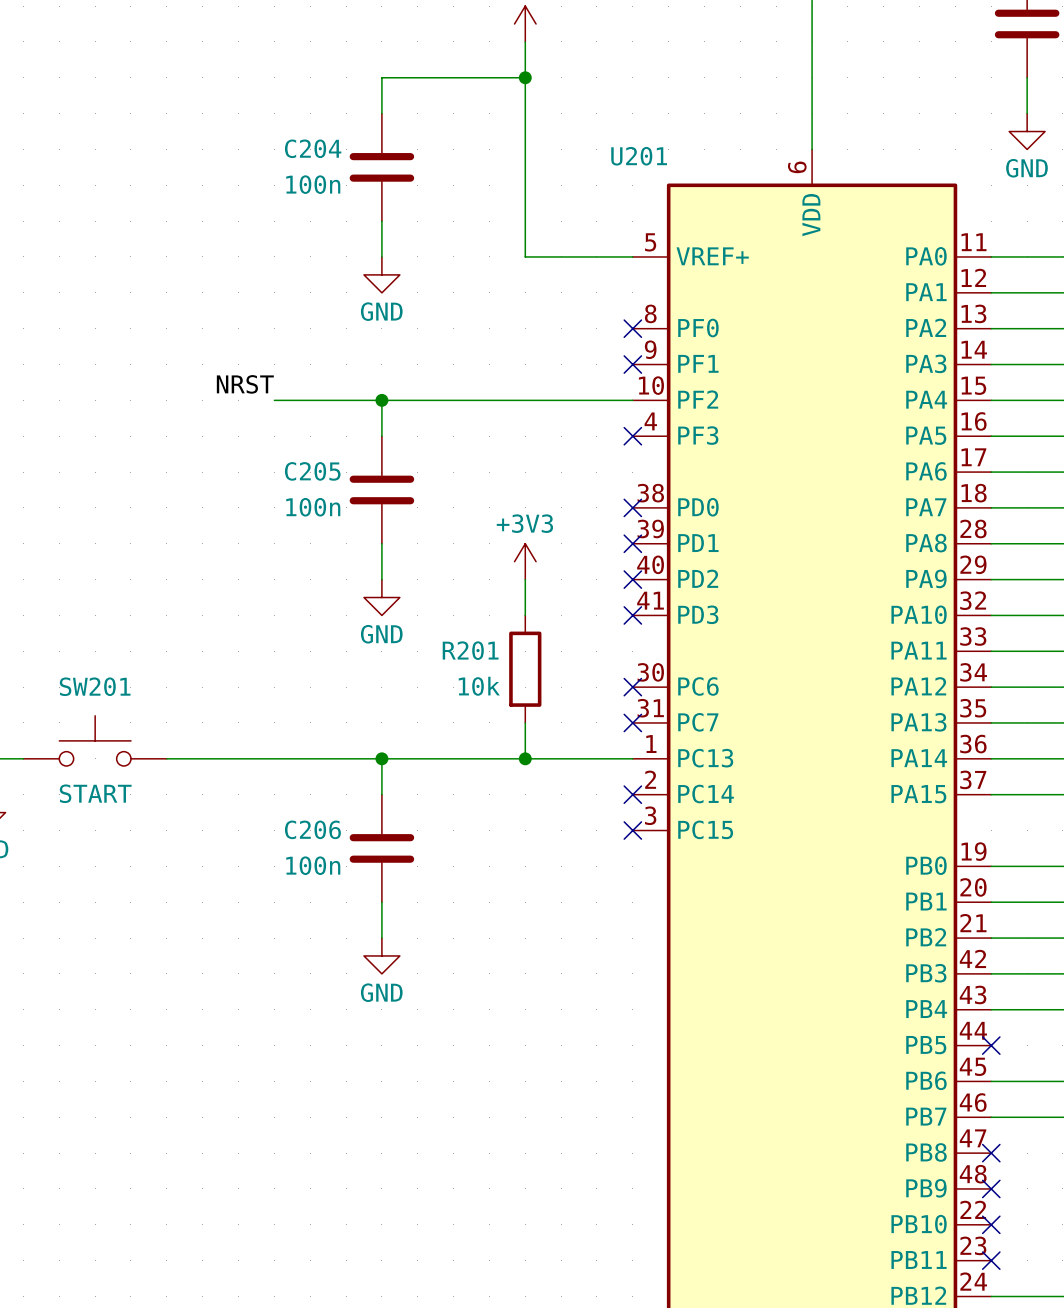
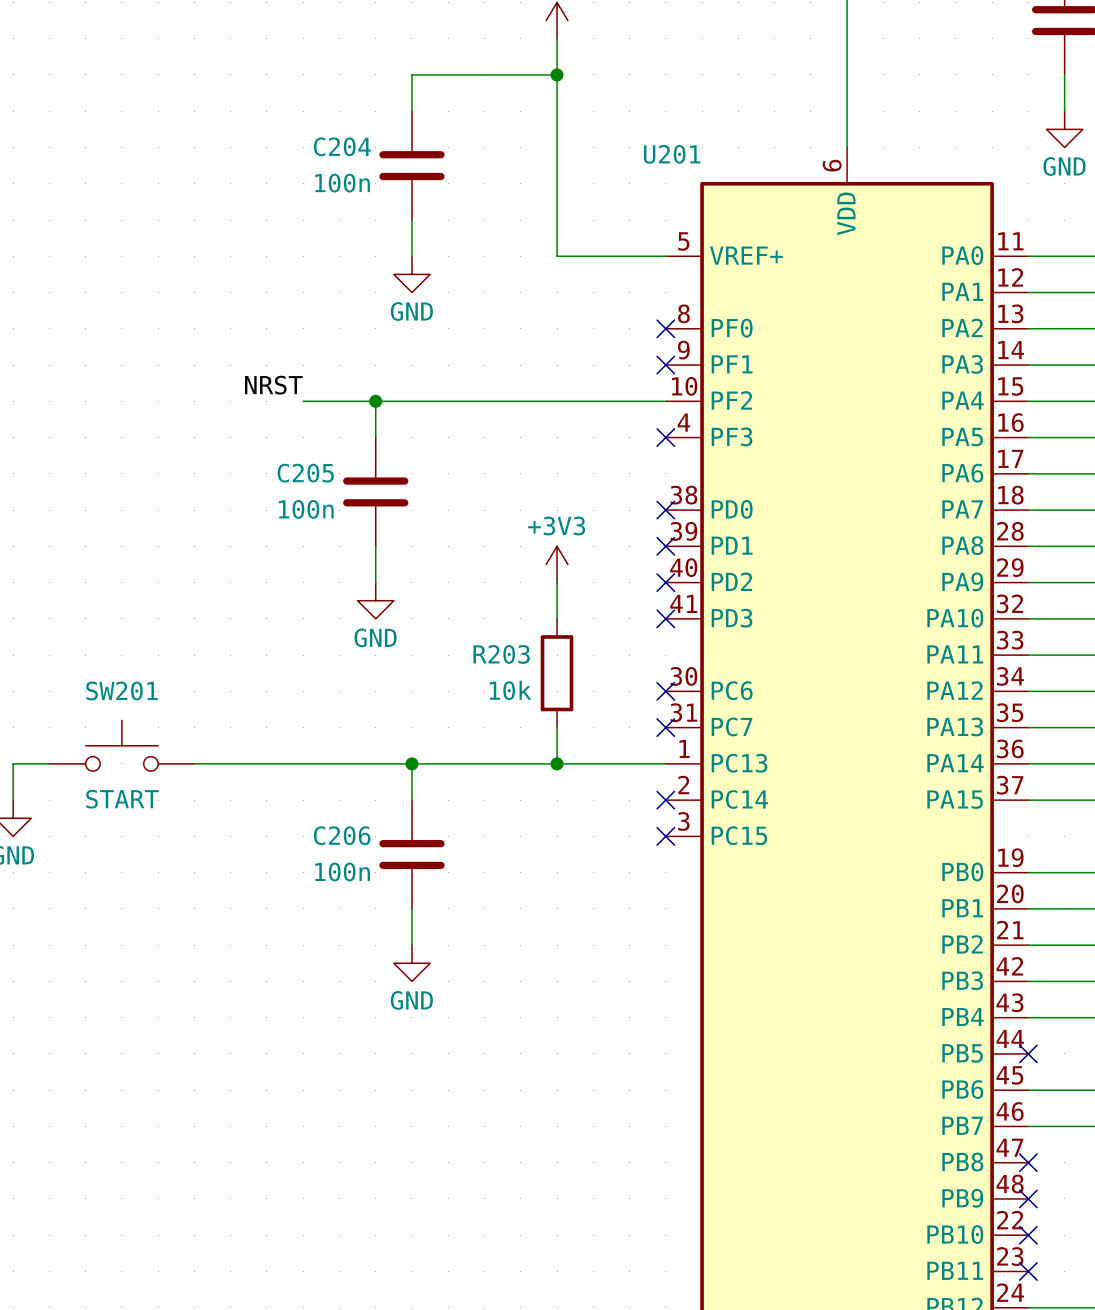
wire: (381, 400) (381, 436) -> (375, 401) (375, 437)
junction position: (381, 400) -> (375, 401)
C205 position: (381, 489) -> (375, 491)
wire: (381, 543) (381, 579) -> (375, 546) (375, 582)
power symbol position: GND (381, 597) -> GND (375, 600)
R201 name: R201 (470, 650) -> R203 (501, 654)

